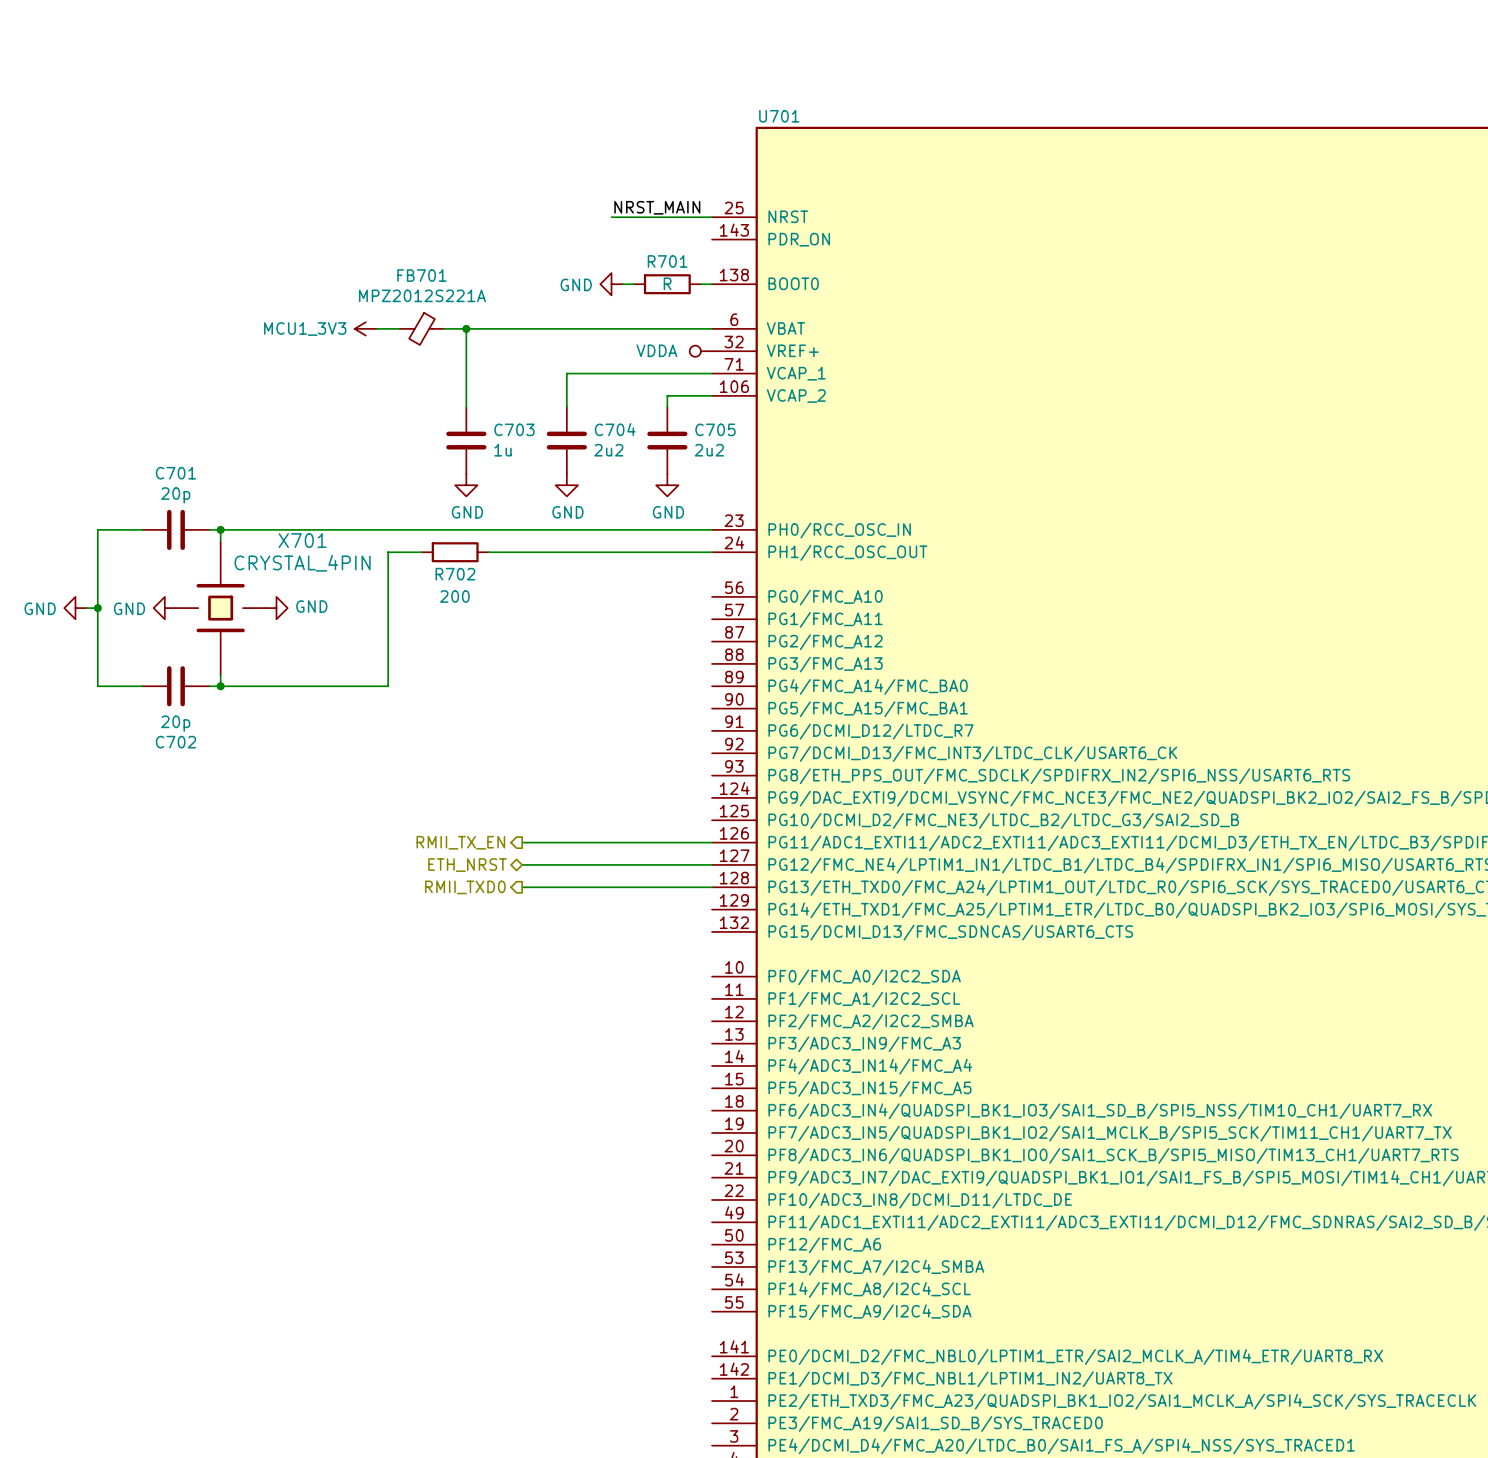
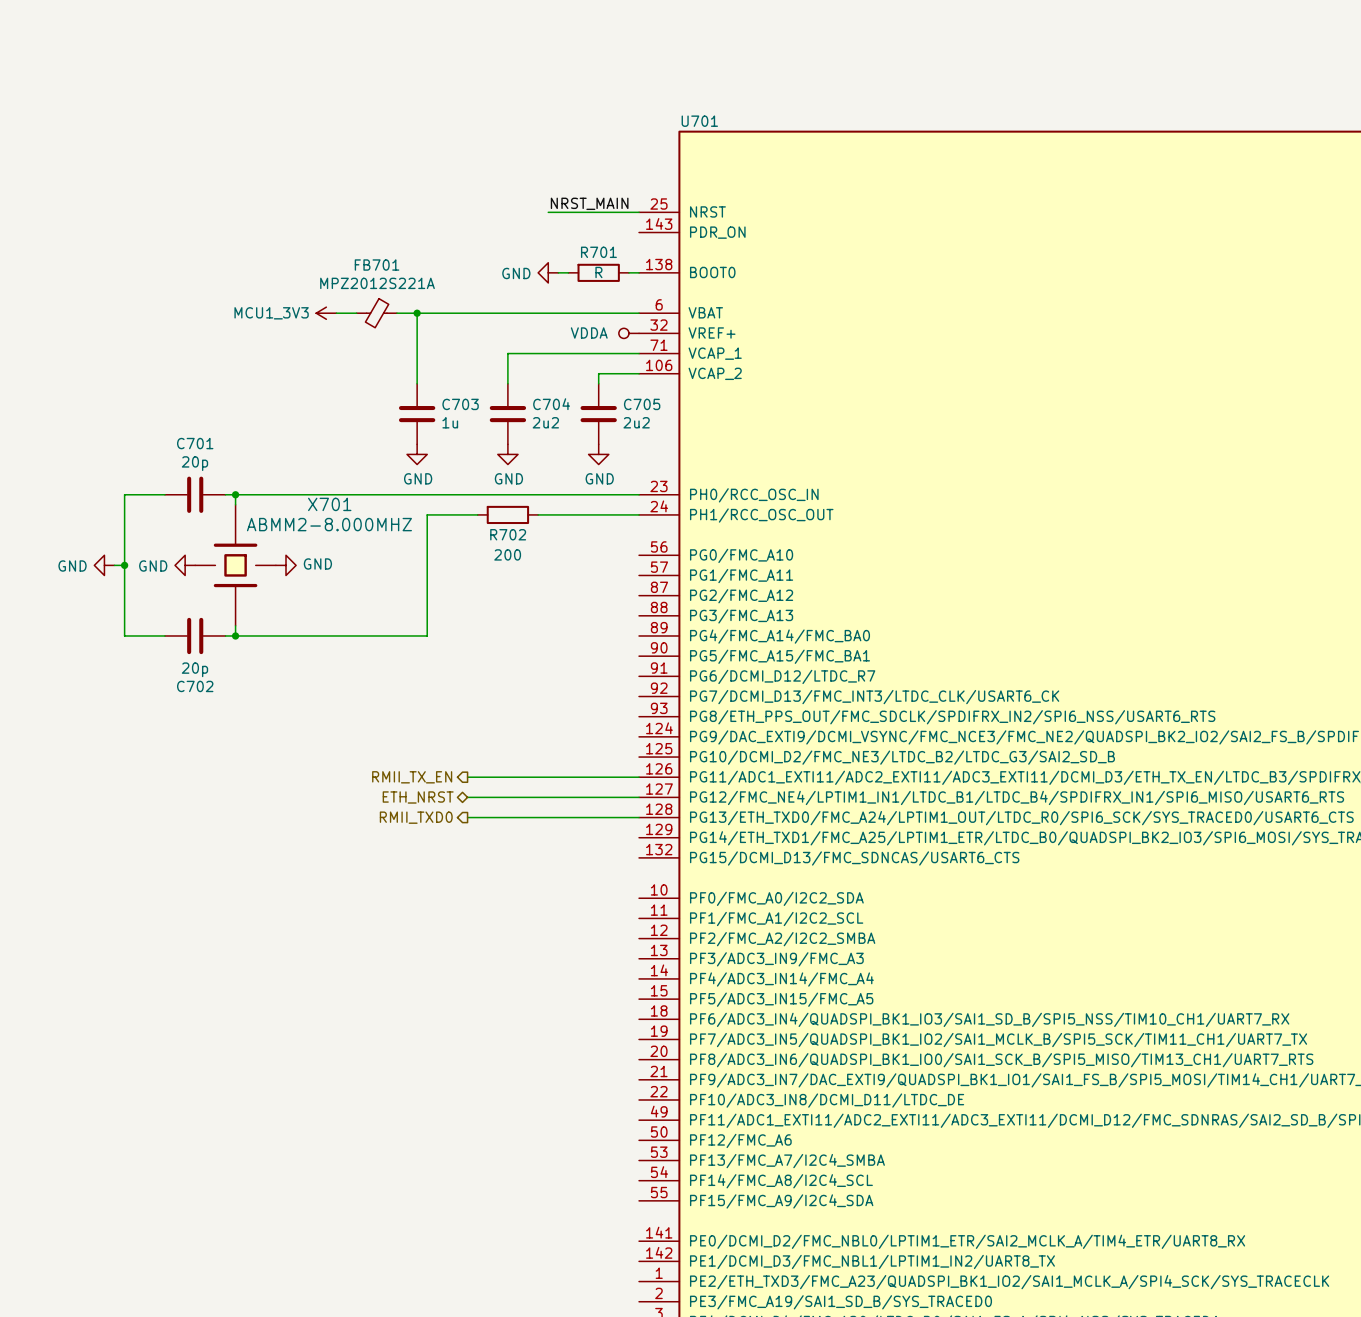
wire: (142, 529) (97, 529) (97, 686) (142, 686) -> (164, 494) (124, 494) (124, 635) (164, 635)
C701 position: (175, 529) -> (195, 494)
wire: (220, 529) (220, 541) -> (235, 494) (235, 504)
junction position: (220, 529) -> (235, 494)
X701 name position: X701 (302, 540) -> X701 (329, 504)
wire: (421, 552) (388, 552) (388, 686) -> (437, 514) (427, 514) (427, 635) (346, 635)
R702 position: (455, 552) -> (507, 514)
wire: (533, 552) (600, 552) -> none
X701 value: CRYSTAL_4PIN (302, 563) -> ABMM2-8.000MHZ (329, 524)
power symbol: GND (75, 608) -> none
wire: (86, 608) (97, 608) -> (114, 565) (124, 565)
junction position: (97, 608) -> (124, 565)
power symbol: none -> GND (104, 565)
power symbol: GND (164, 608) -> none
power symbol: none -> GND (185, 565)
X701 position: (220, 608) -> (235, 565)
power symbol: GND (276, 608) -> none
power symbol: none -> GND (286, 565)
wire: (220, 675) (220, 686) -> (235, 625) (235, 635)
C702 position: (175, 686) -> (195, 635)
junction position: (220, 686) -> (235, 635)

